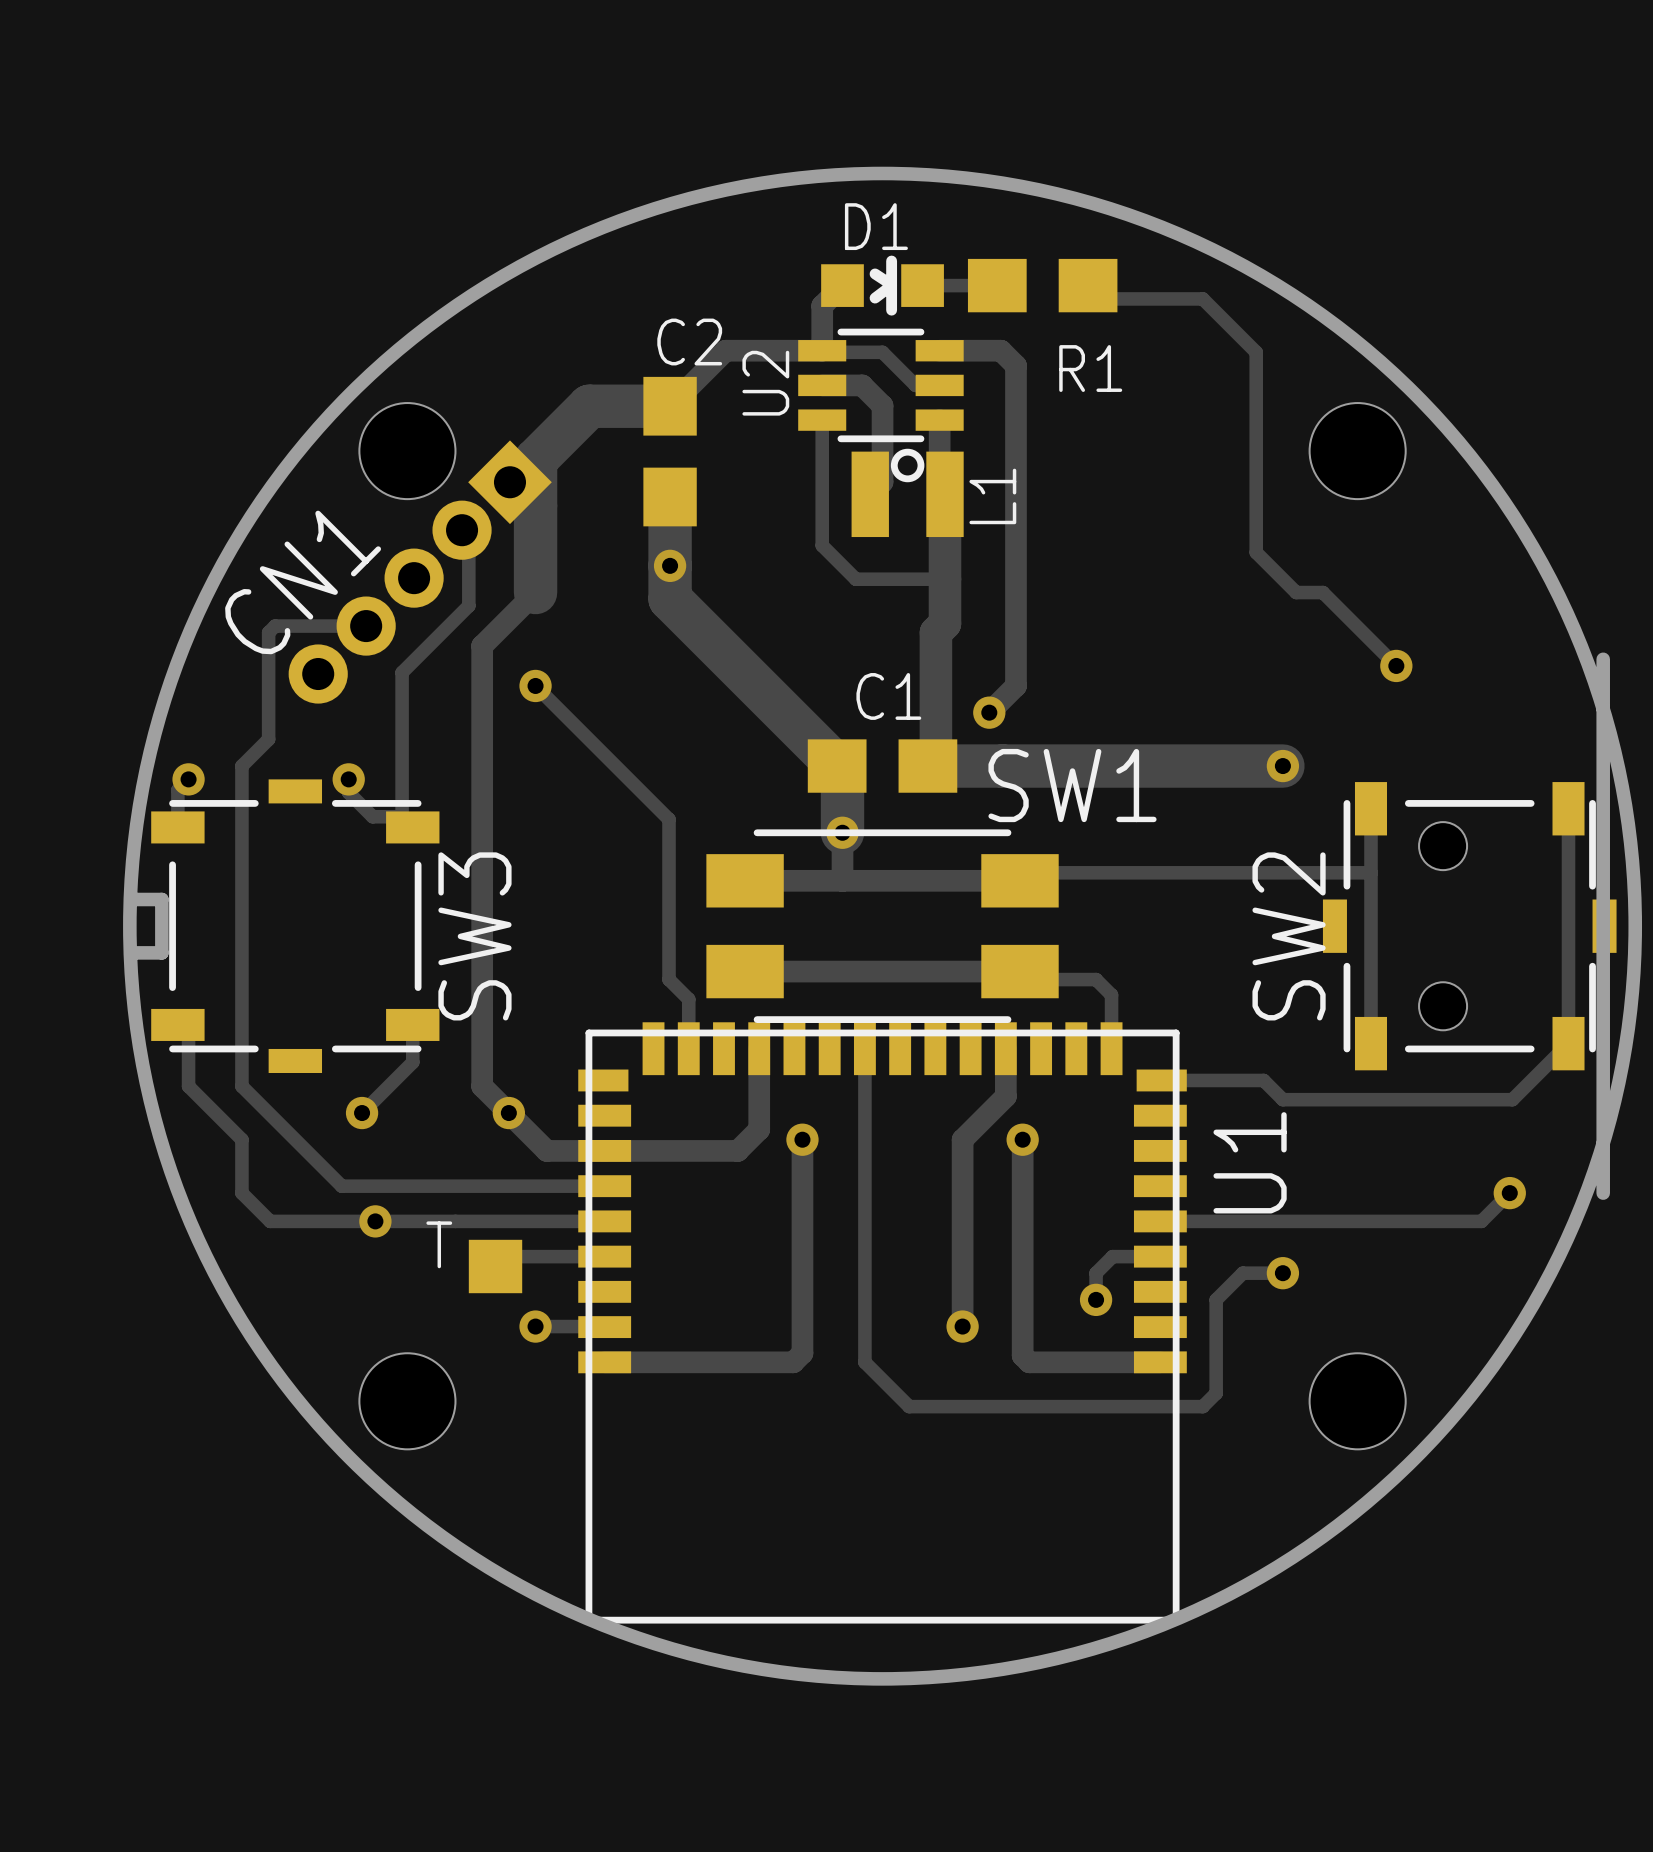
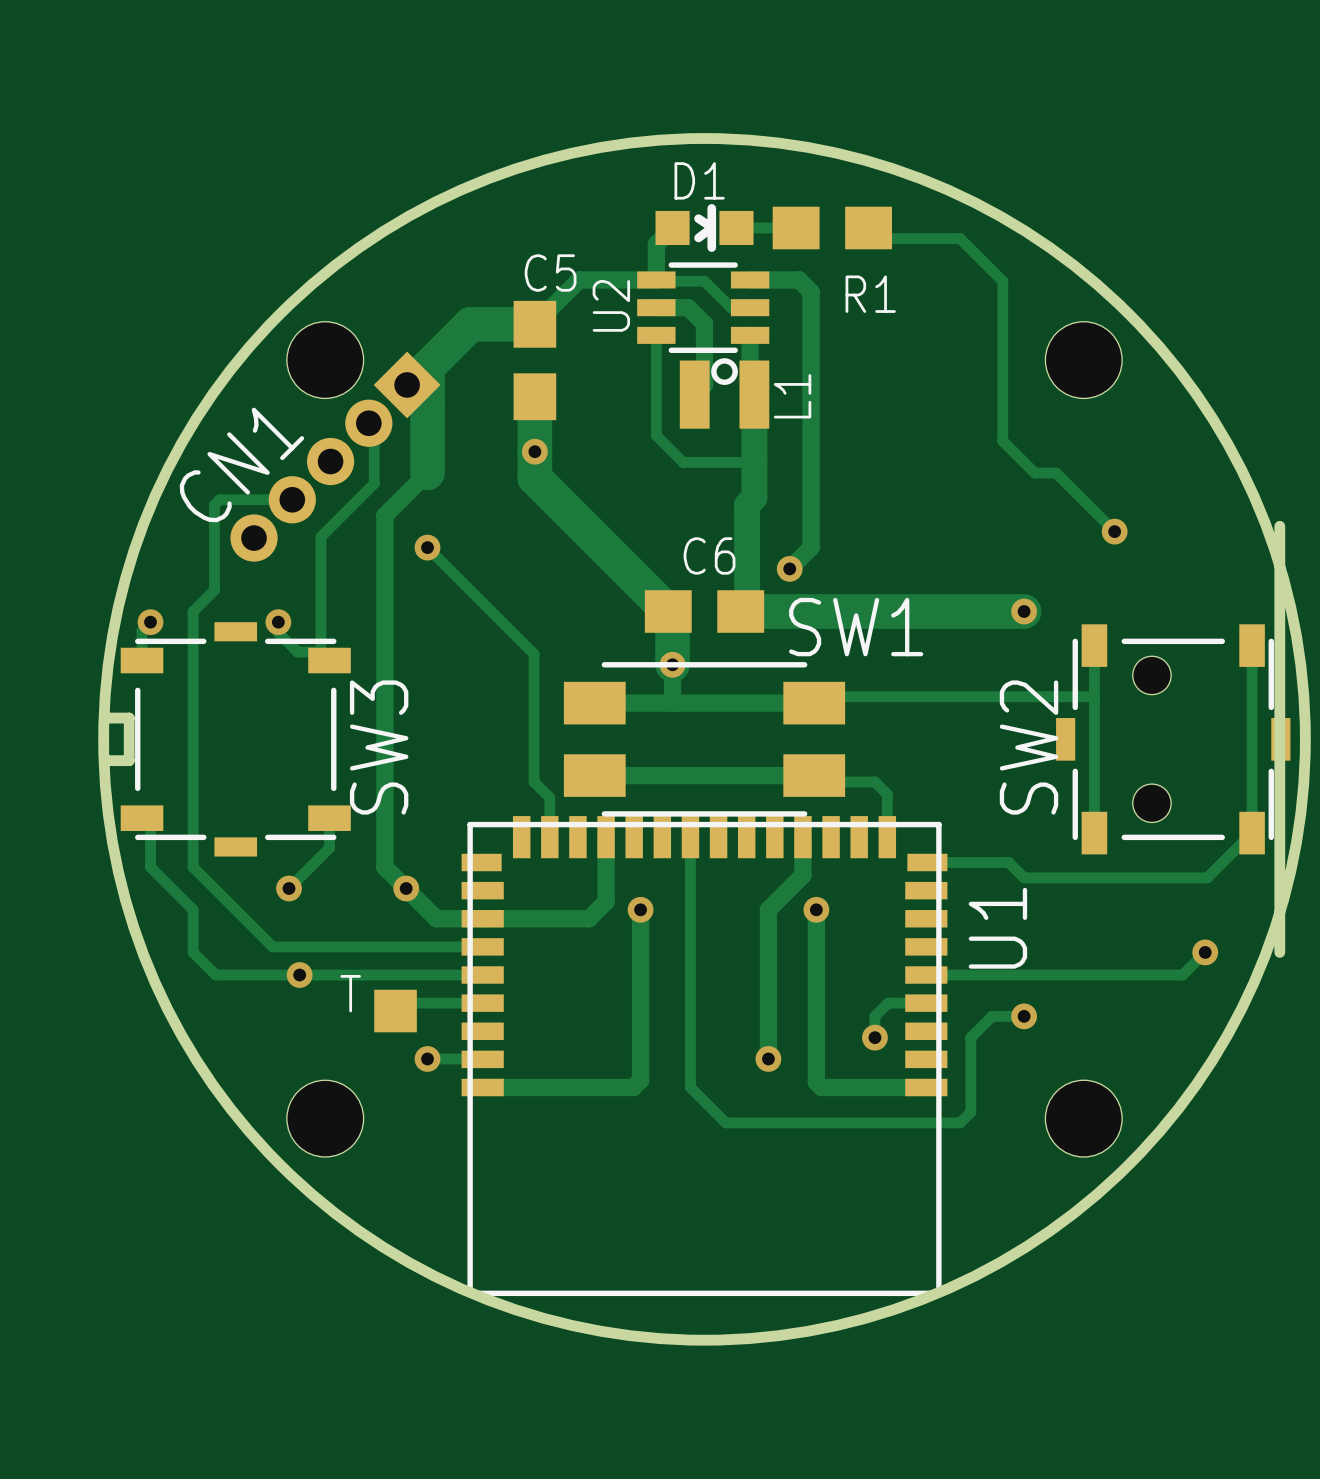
C2 name: C2 (689, 342) -> C5 (550, 273)
C1 name: C1 (888, 696) -> C6 (709, 555)

